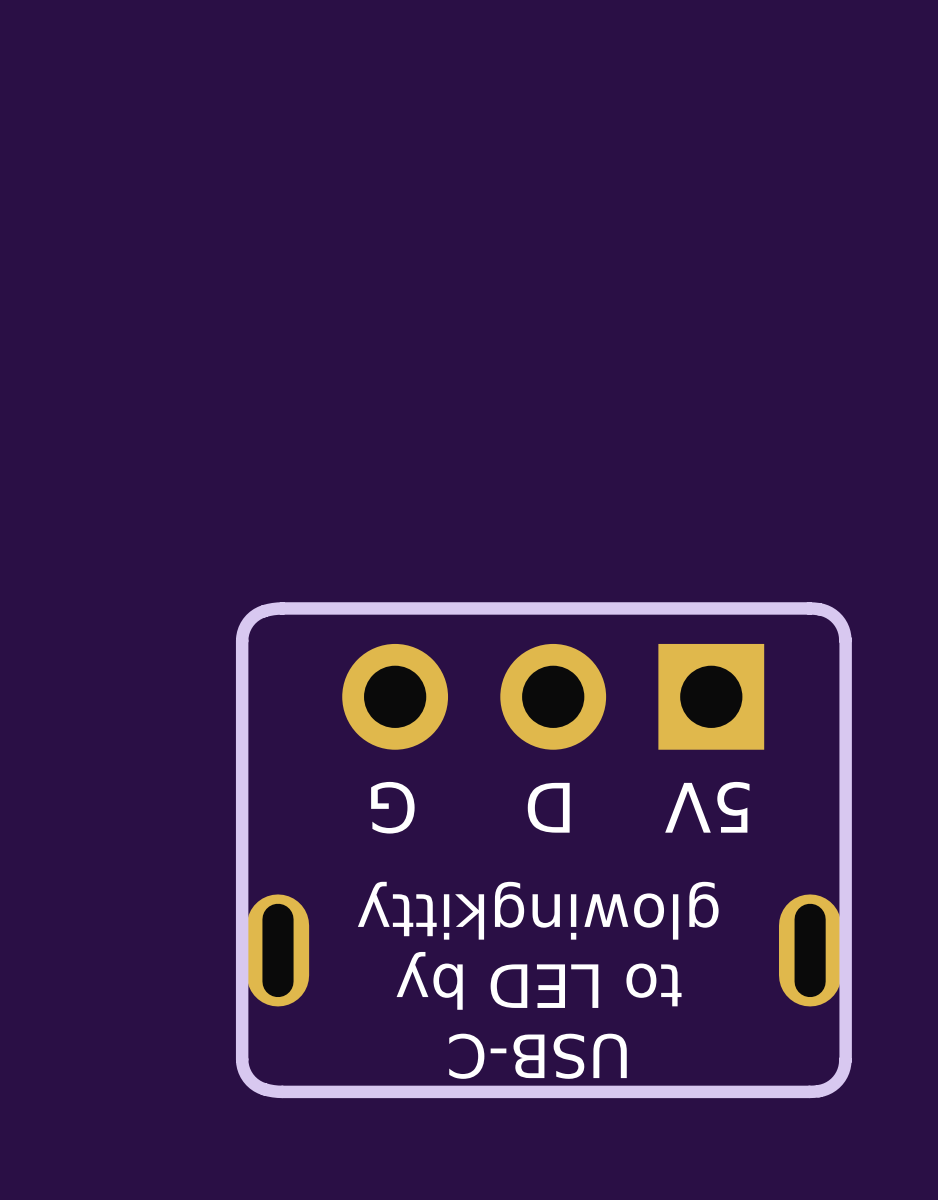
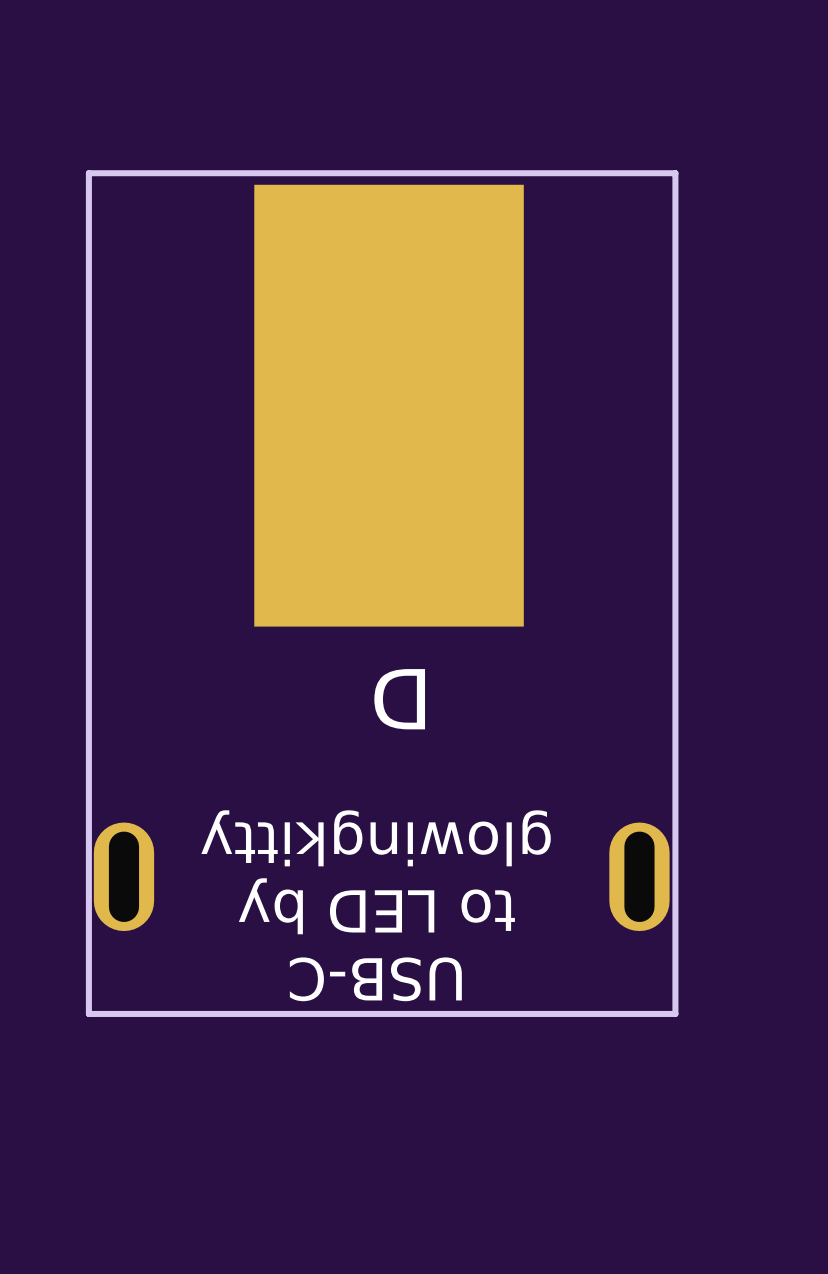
part: none -> (389, 405)
part: (553, 696) -> none
text: G (392, 807) -> none
text position: D (548, 807) -> D (399, 699)
text: 5V (707, 807) -> none
board edge: (809, 1091) (822, 1090) (832, 1085) (840, 1077) (845, 1064) (845, 639) (841, 625) (835, 617) (822, 609) (809, 608) (282, 608) (264, 611) (250, 619) (244, 629) (242, 640) (242, 1063) (246, 1074) (253, 1083) (264, 1089) (282, 1091) -> (638, 1013) (675, 1013) (675, 173) (88, 173) (88, 1013) (128, 1013)
board edge width: thick (809, 1091) (282, 1091) -> thin (638, 1013) (128, 1013)

